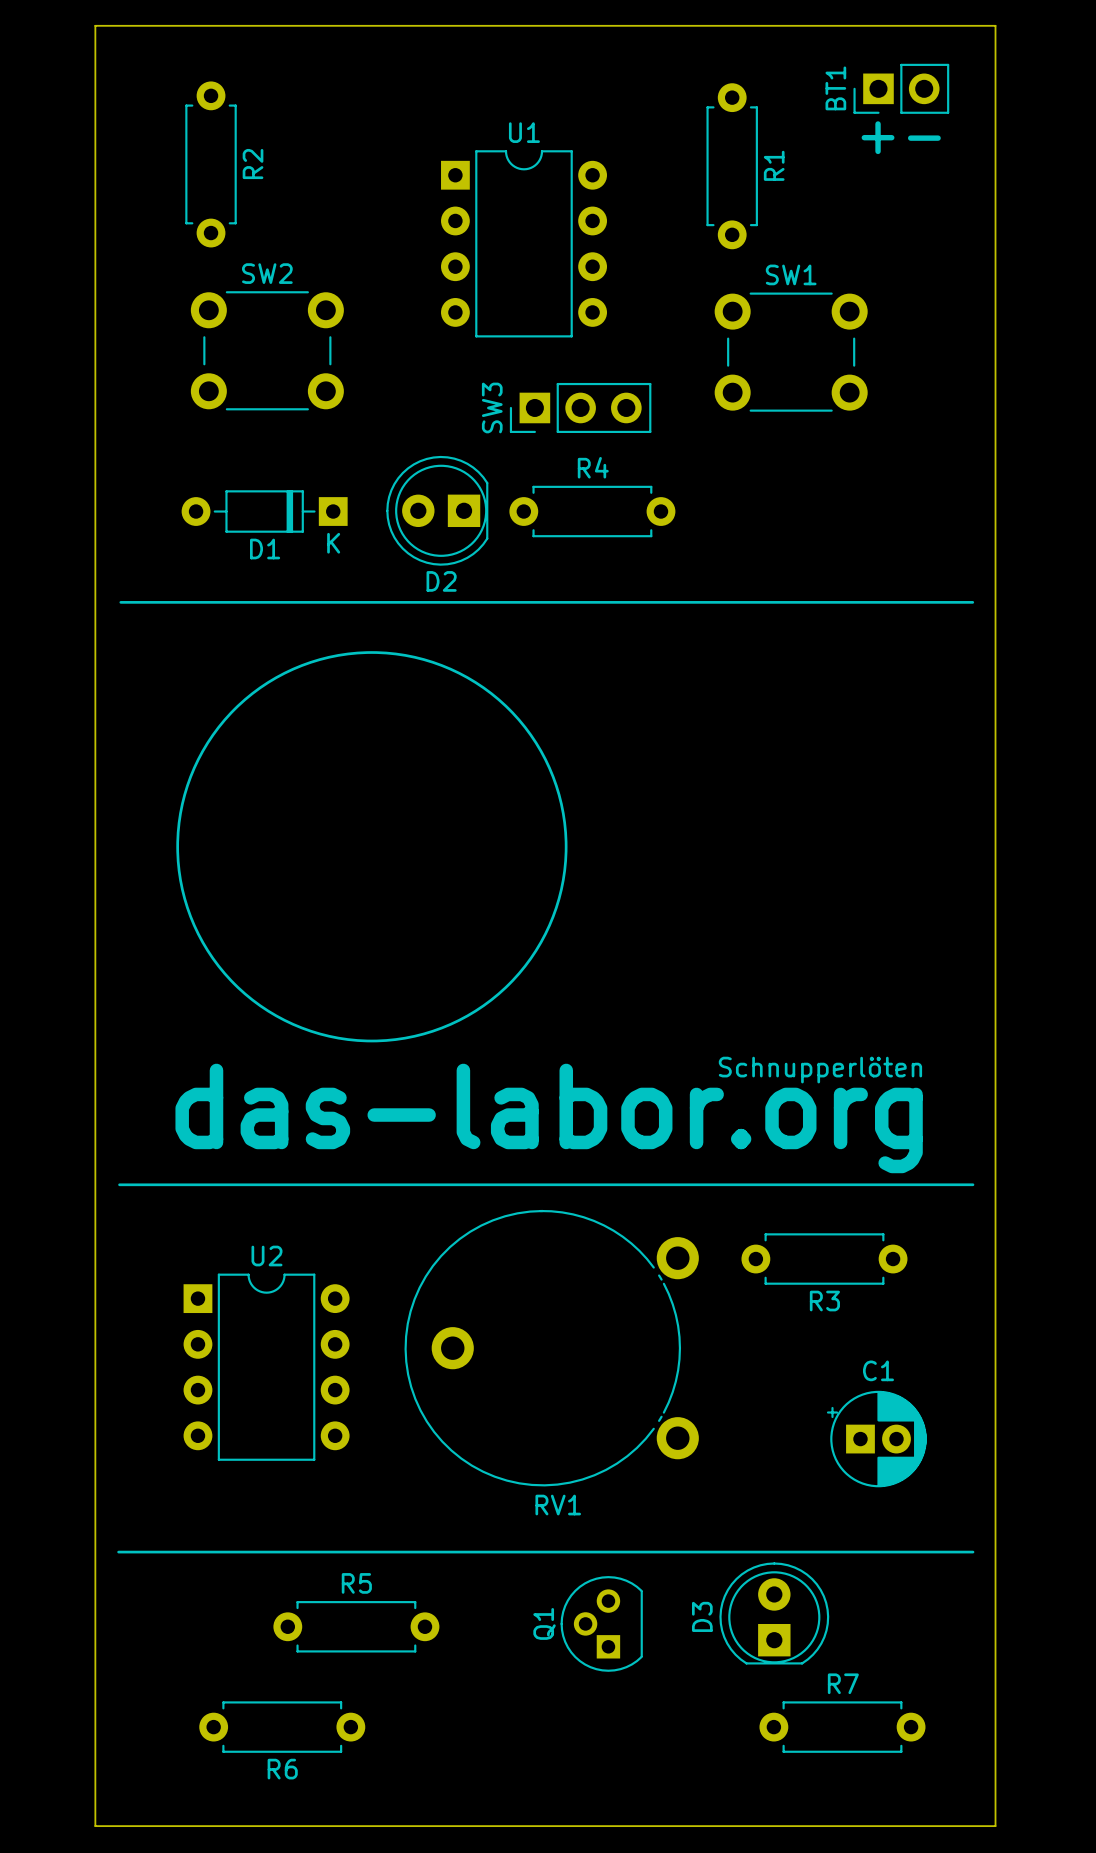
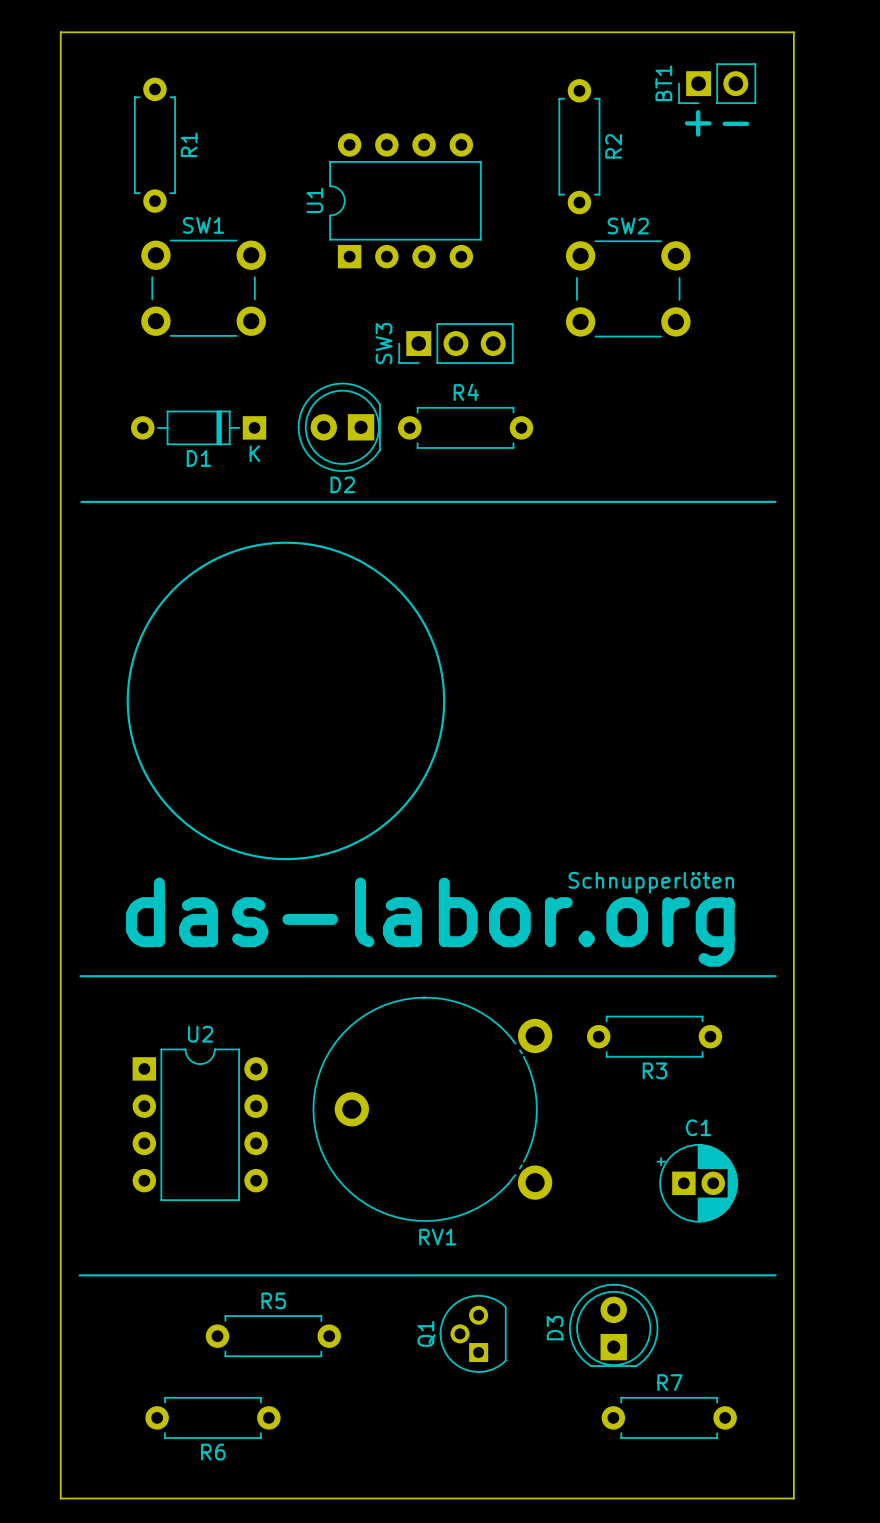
R2 name: R2 (253, 164) -> R1 (189, 144)
R1 name: R1 (774, 165) -> R2 (613, 146)
U1 rotation: 0° (524, 243) -> 90° counterclockwise (405, 200)
SW2 position: (267, 350) -> (628, 288)
SW1 position: (791, 352) -> (203, 288)

